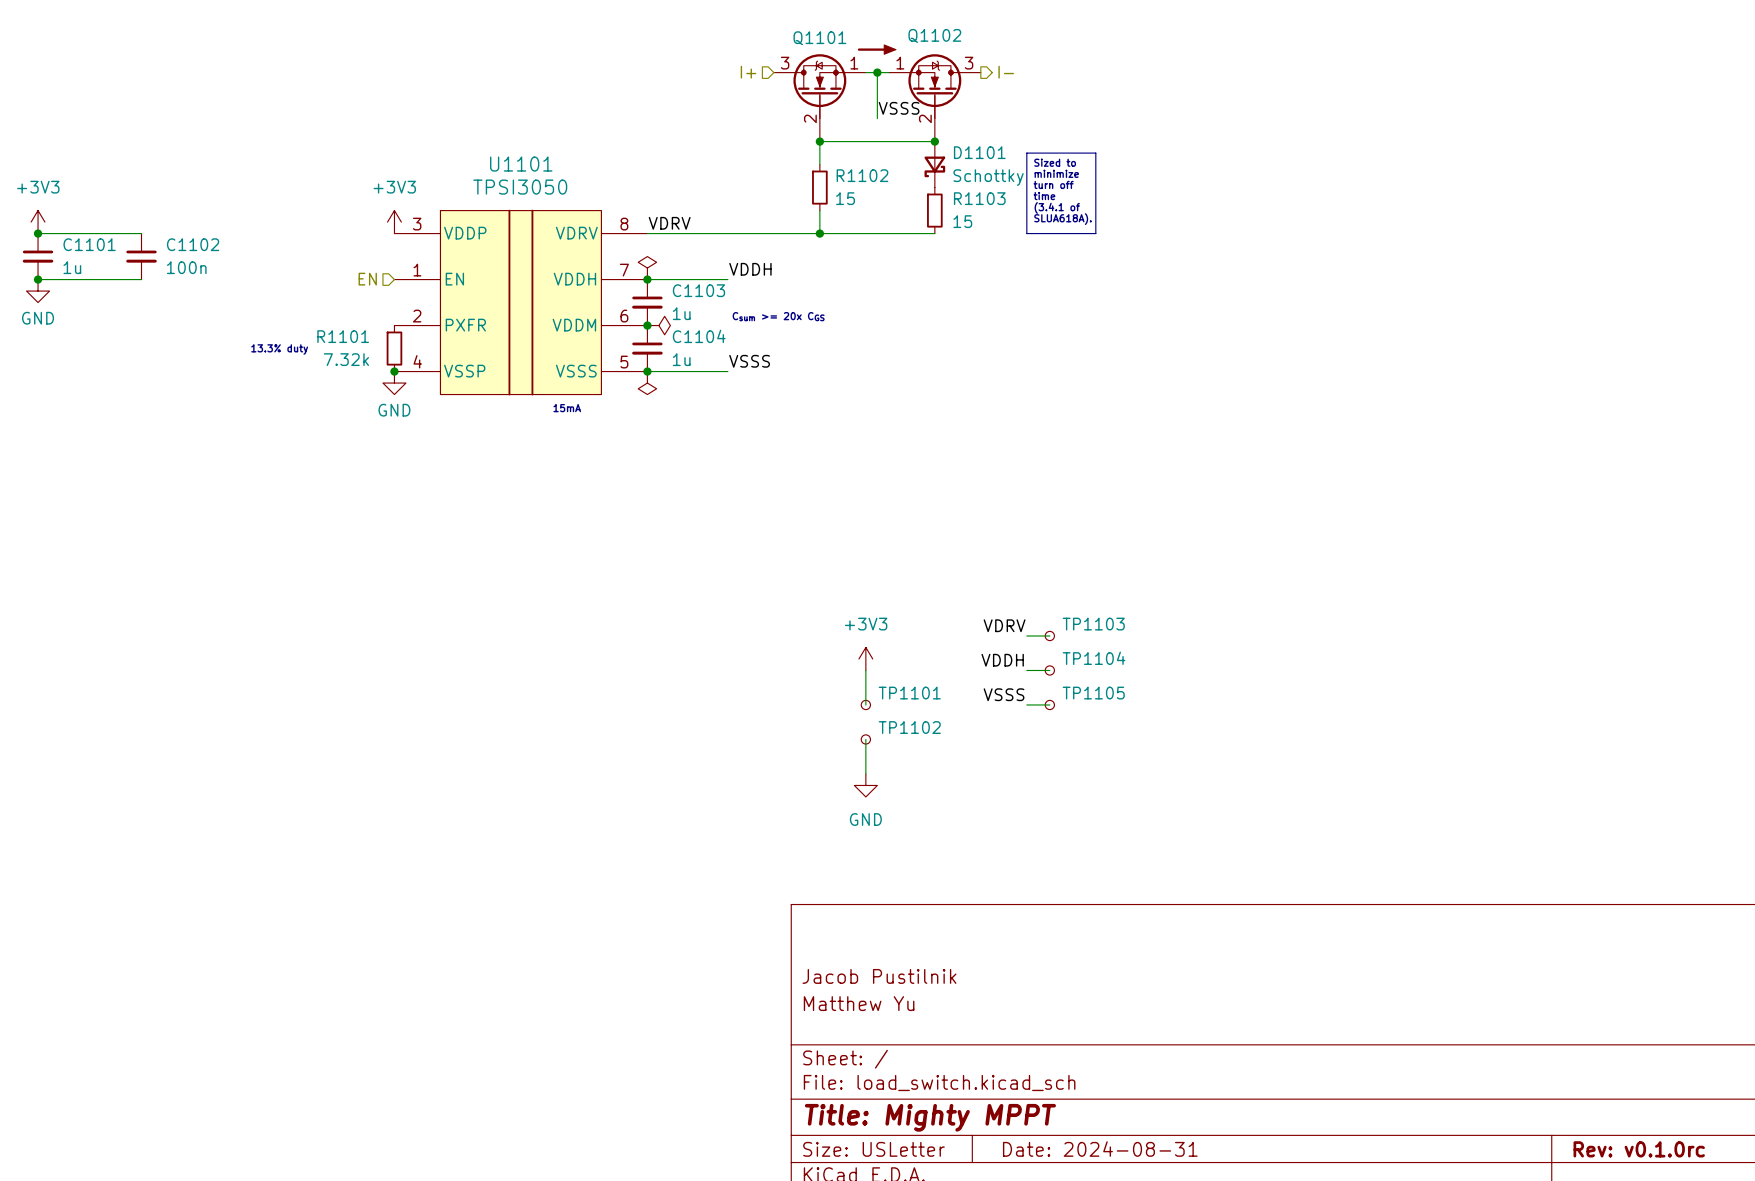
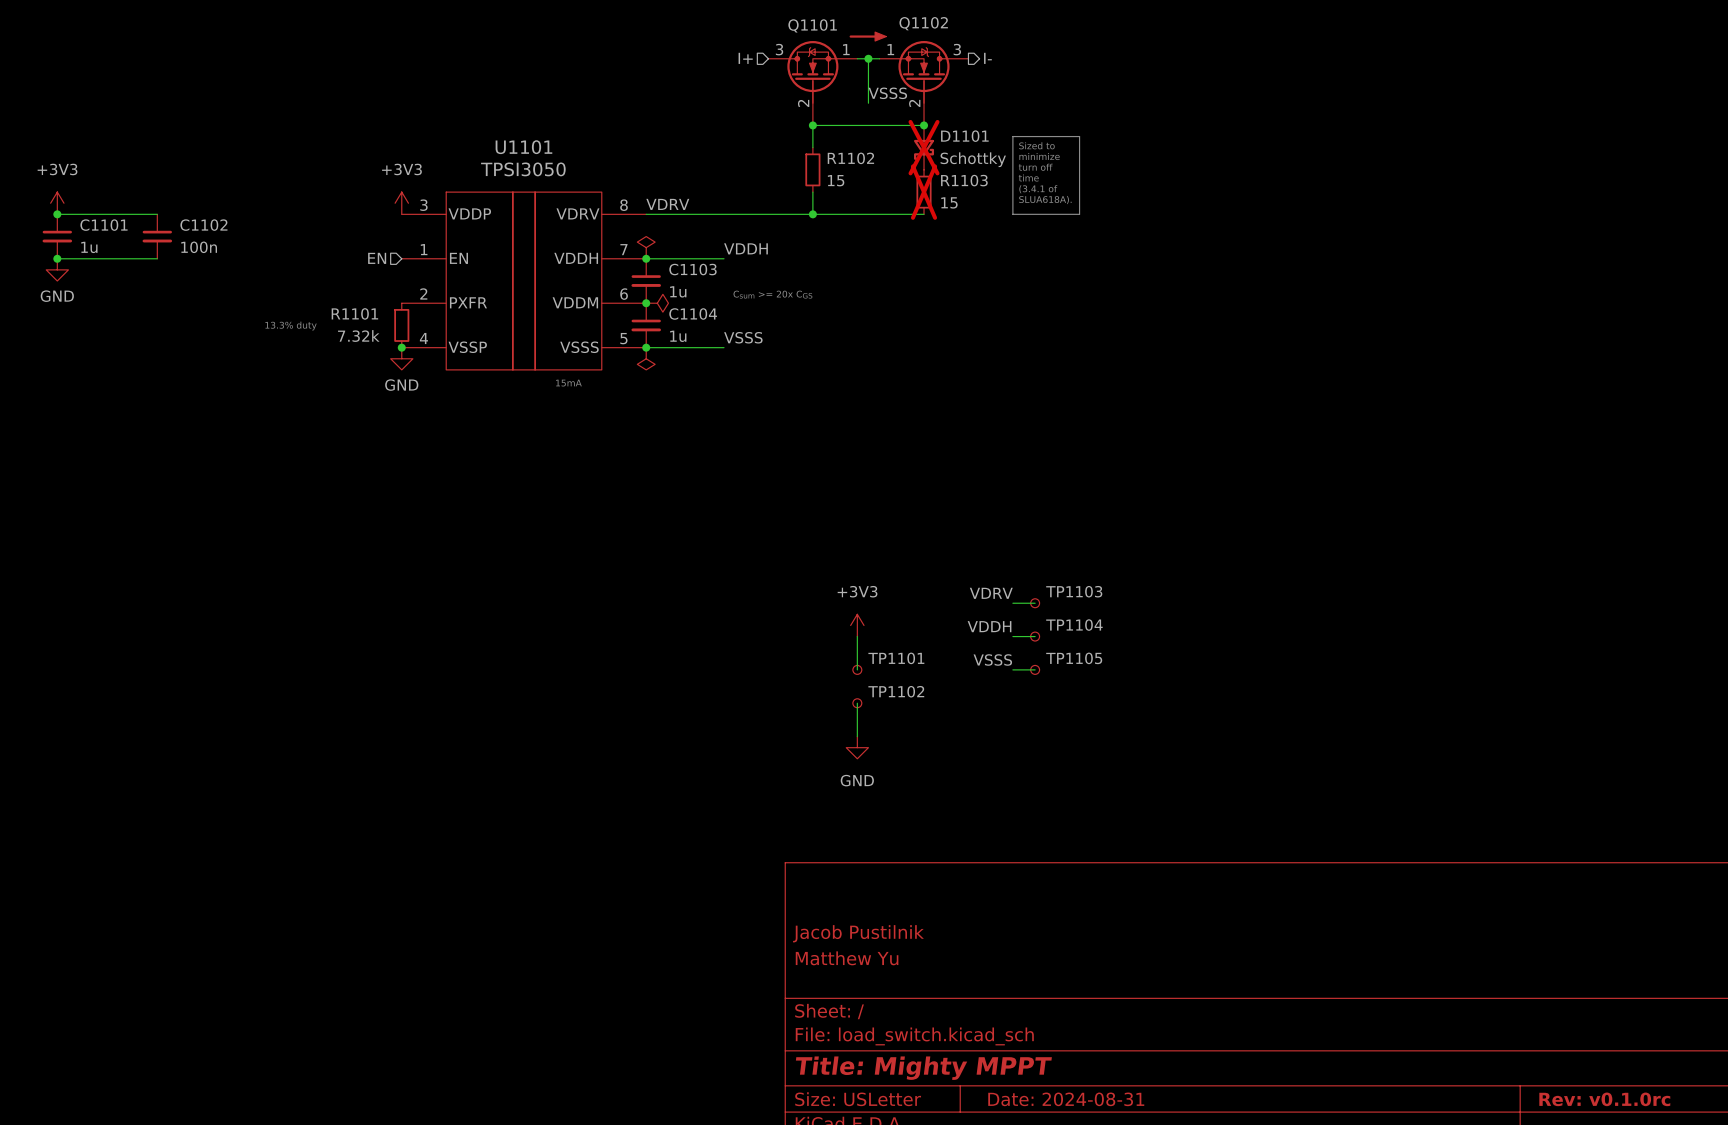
D1101 do-not-place cross: none -> (924, 147)
R1103 do-not-place cross: none -> (924, 192)

